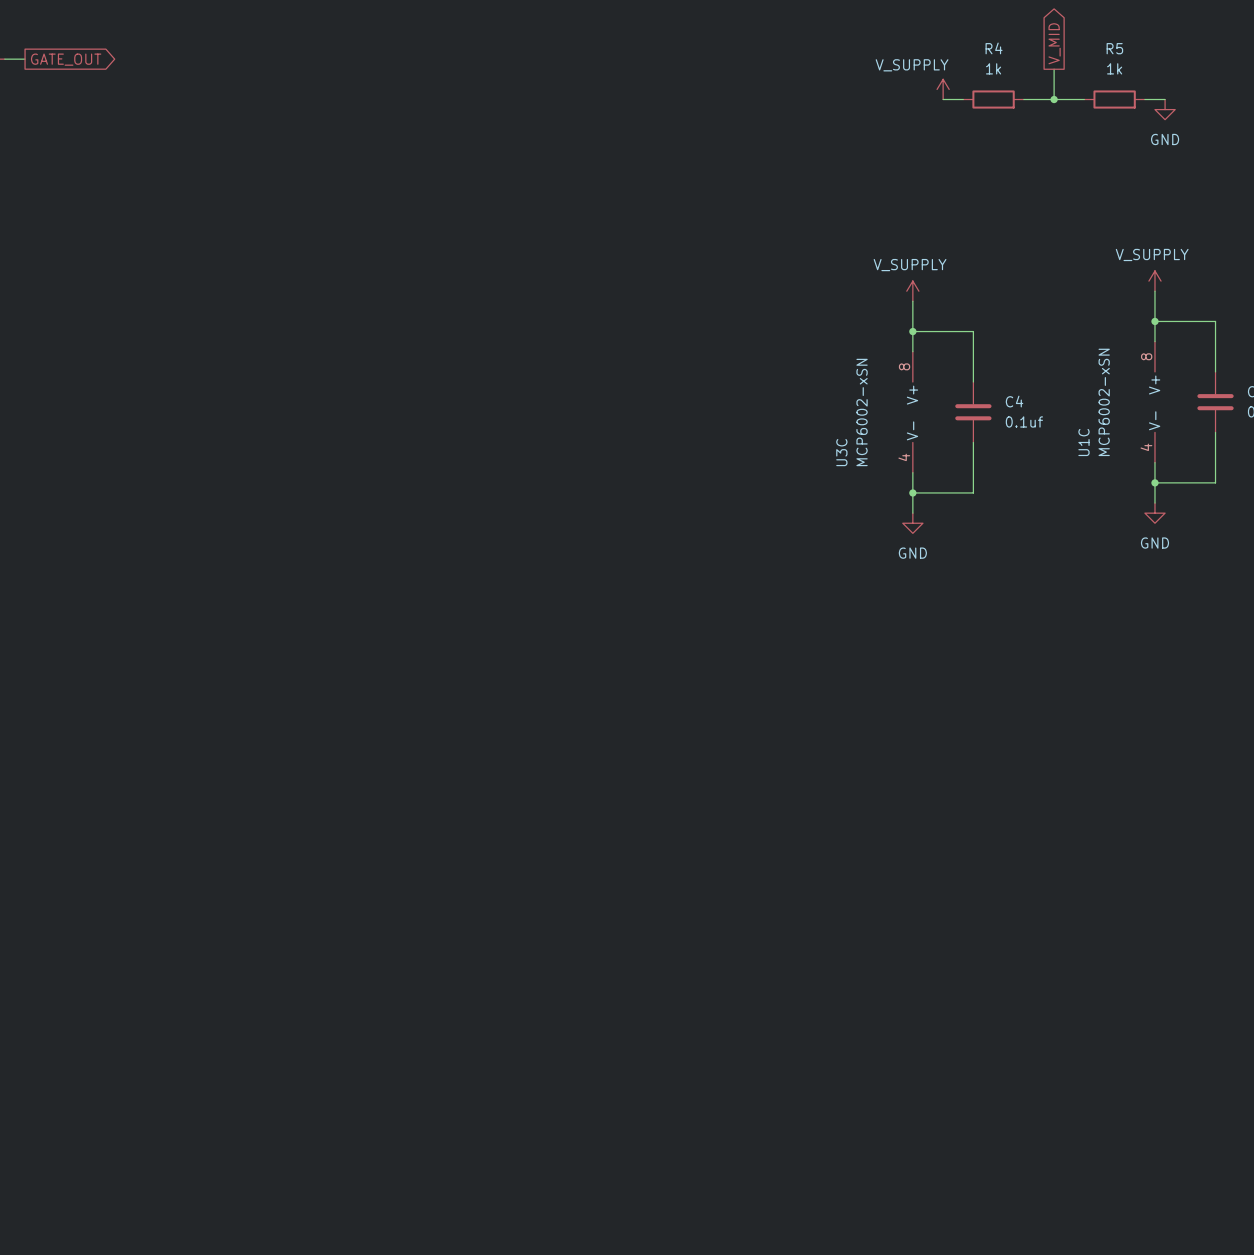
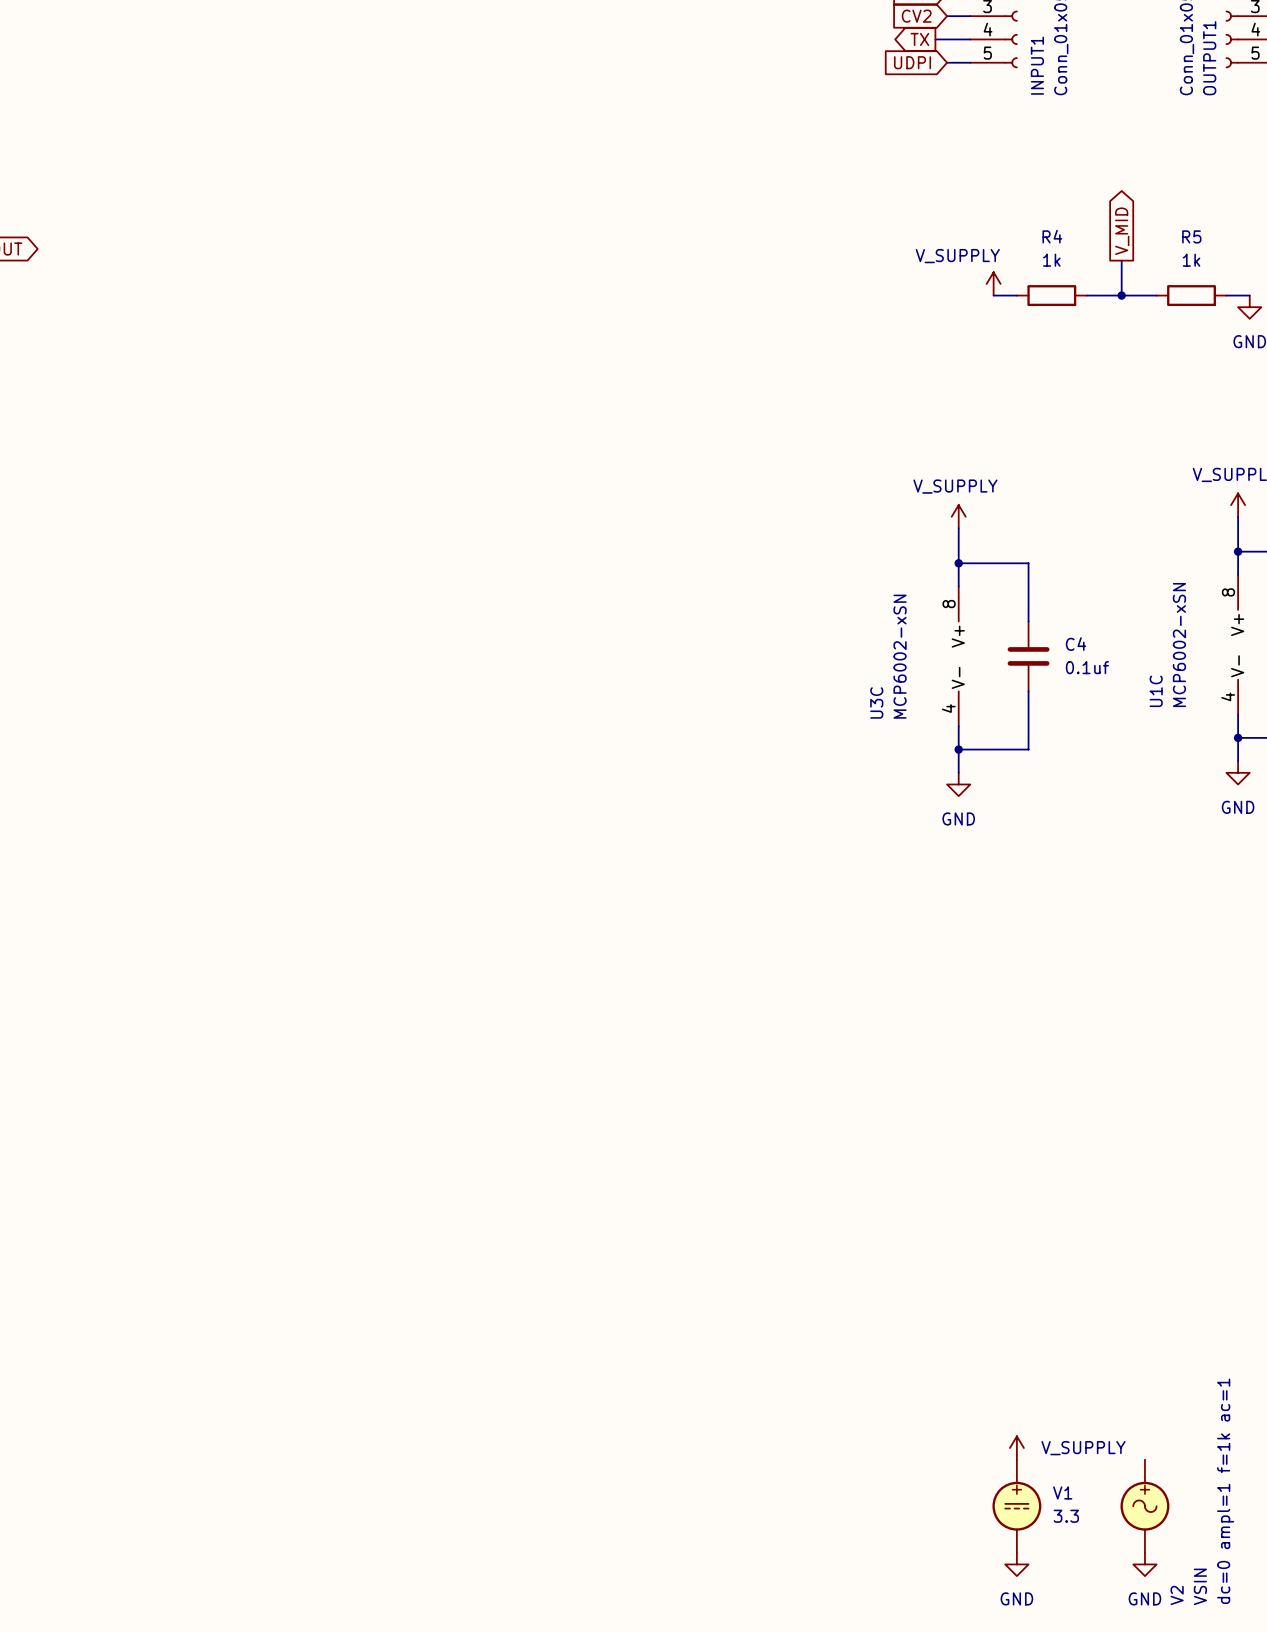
power symbol: none -> V_SUPPLY (1016, 1448)
V1: none -> 3.3 (1016, 1506)
V2: none -> VSIN (1144, 1506)
power symbol: none -> GND (1016, 1564)
power symbol: none -> GND (1144, 1564)

